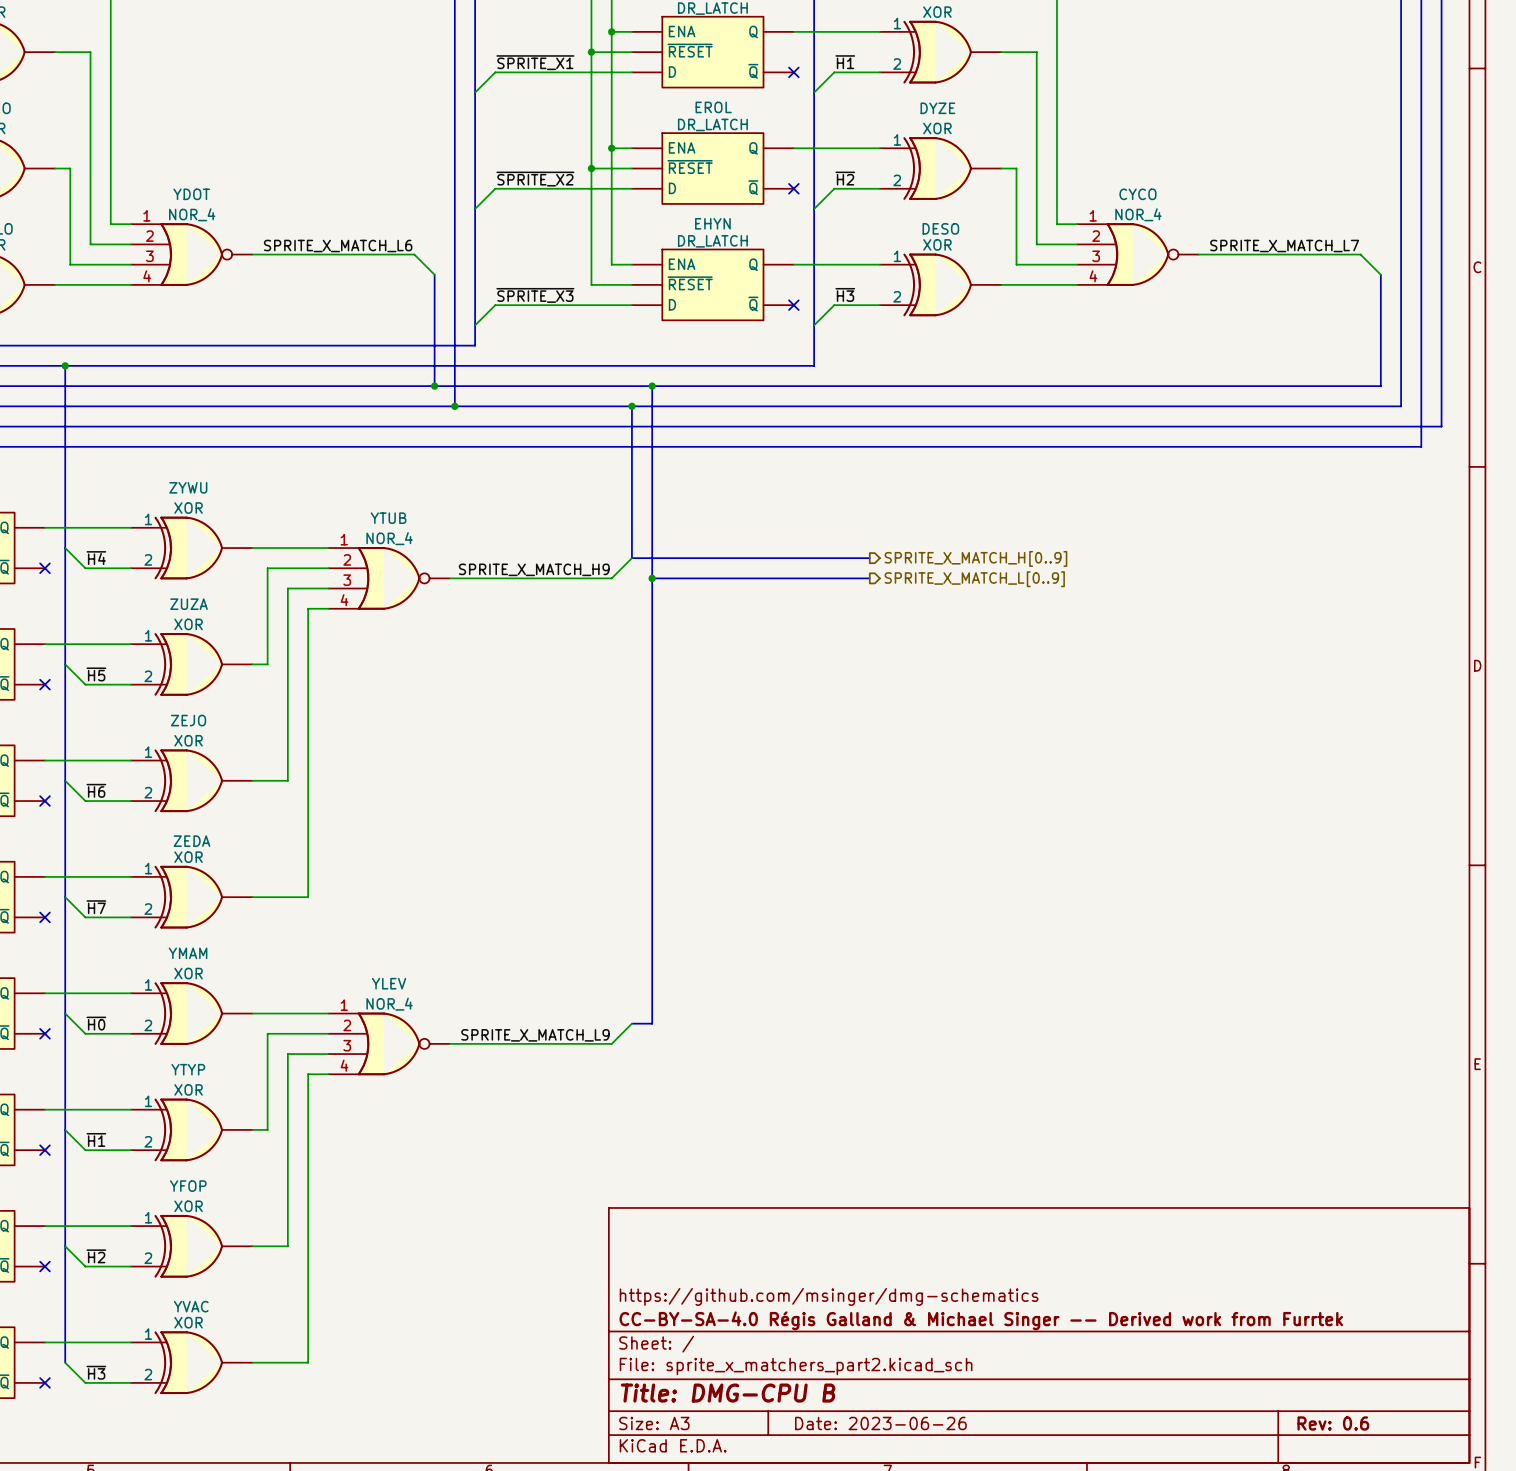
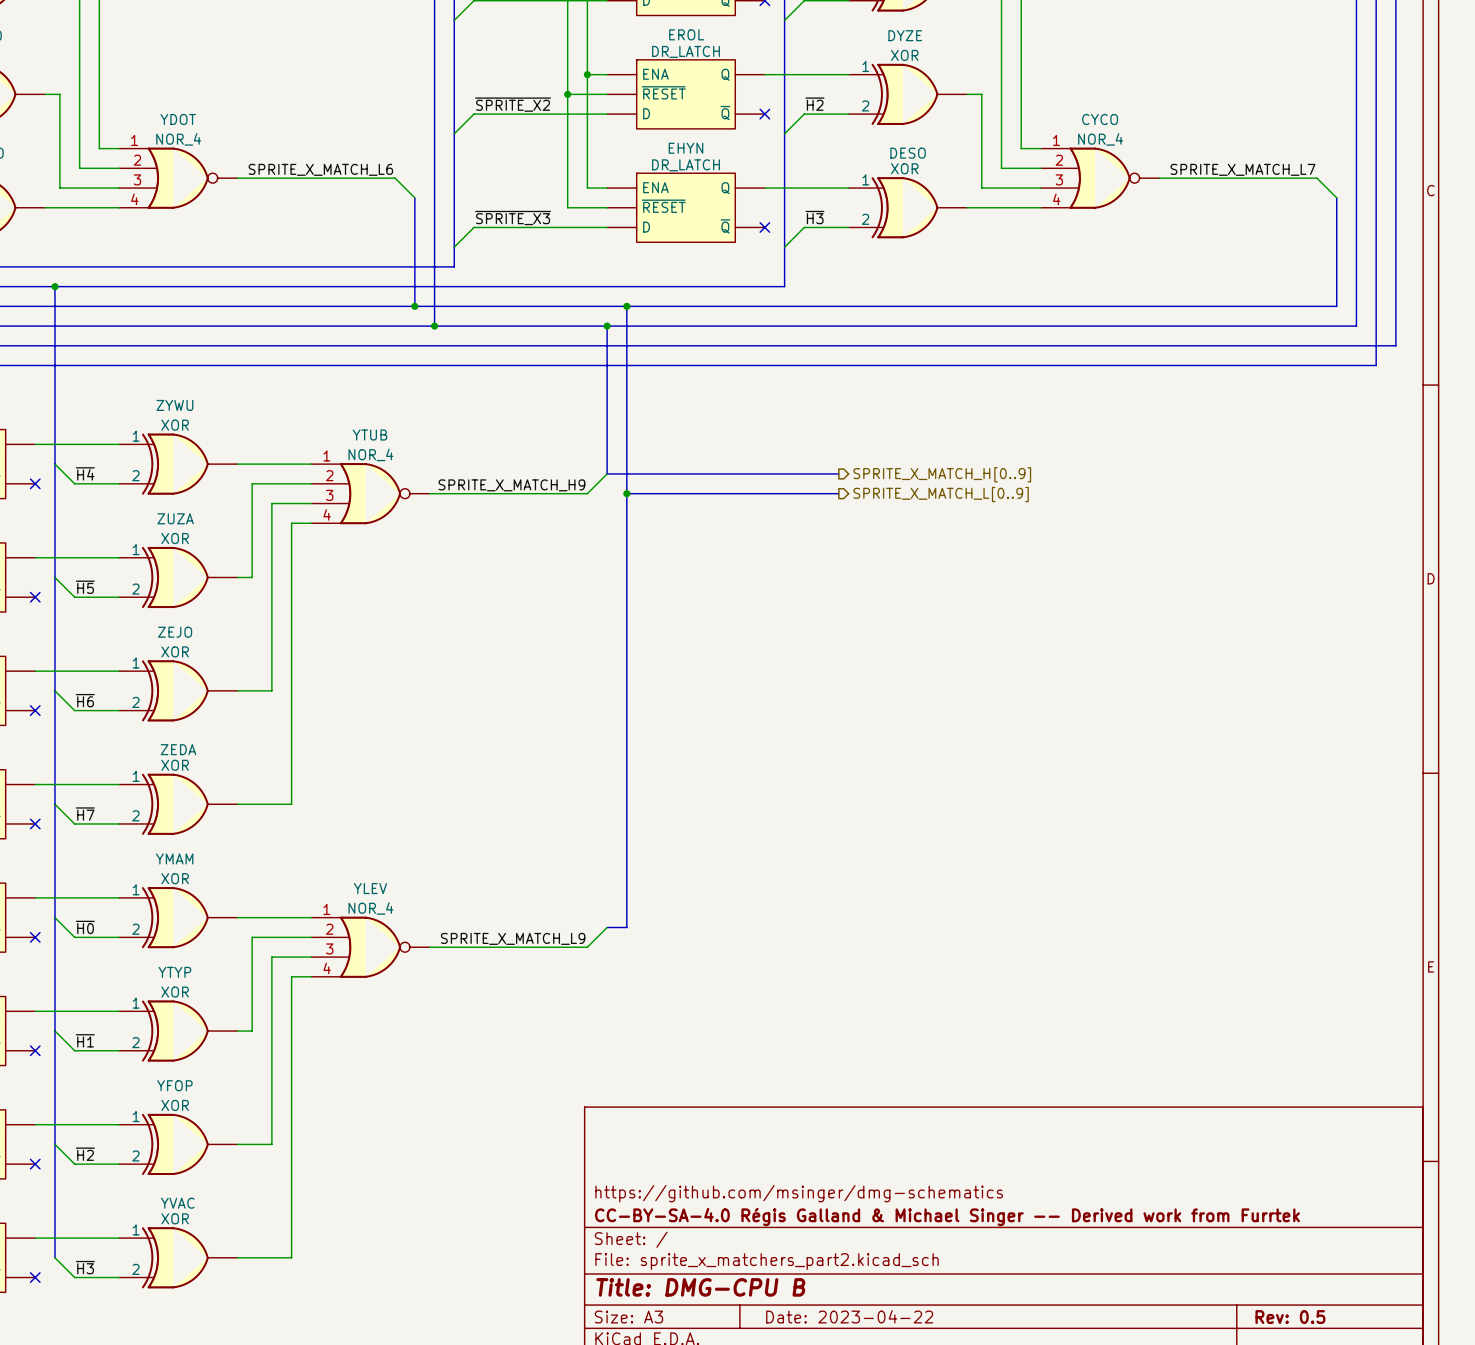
title block: Date: 2023-06-26 (880, 1423) -> Date: 2023-04-22 (849, 1316)
title block: Rev: 0.6 (1333, 1423) -> Rev: 0.5 (1290, 1317)

